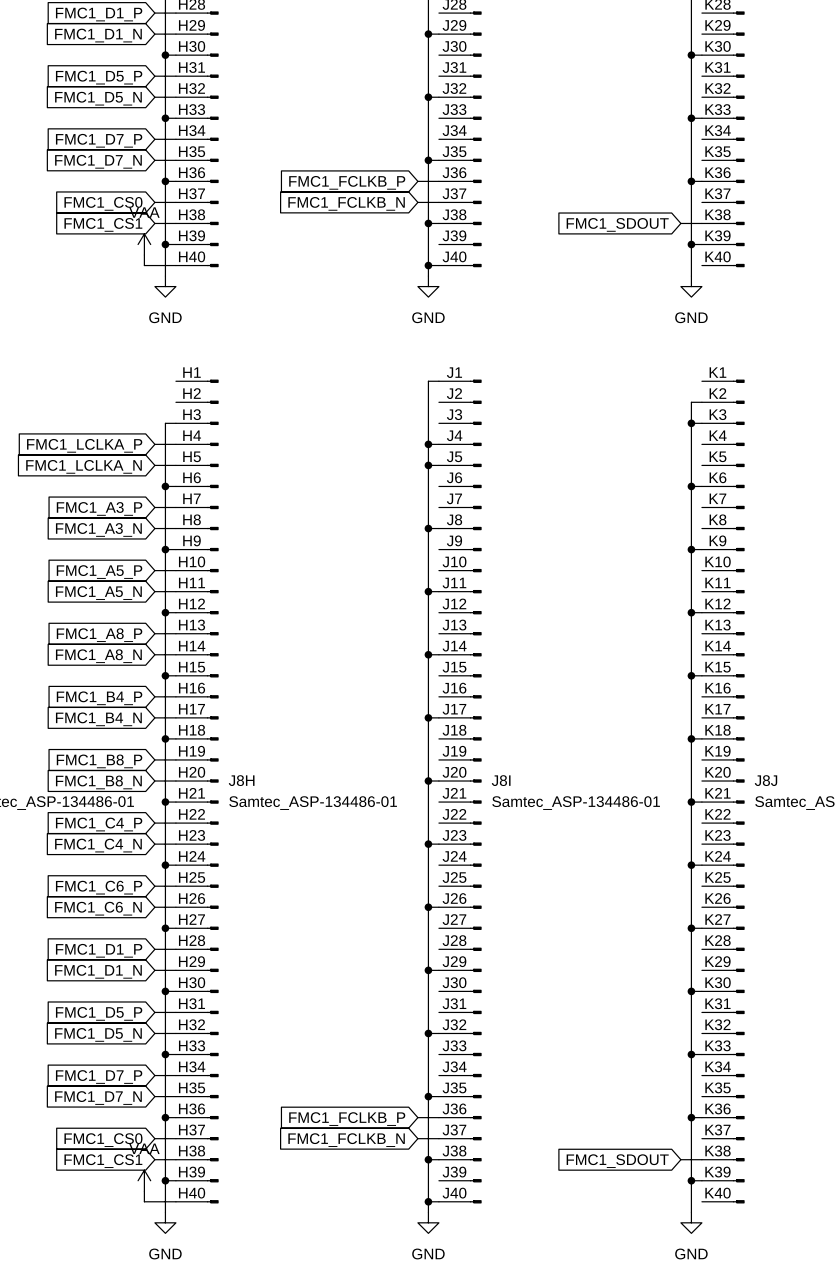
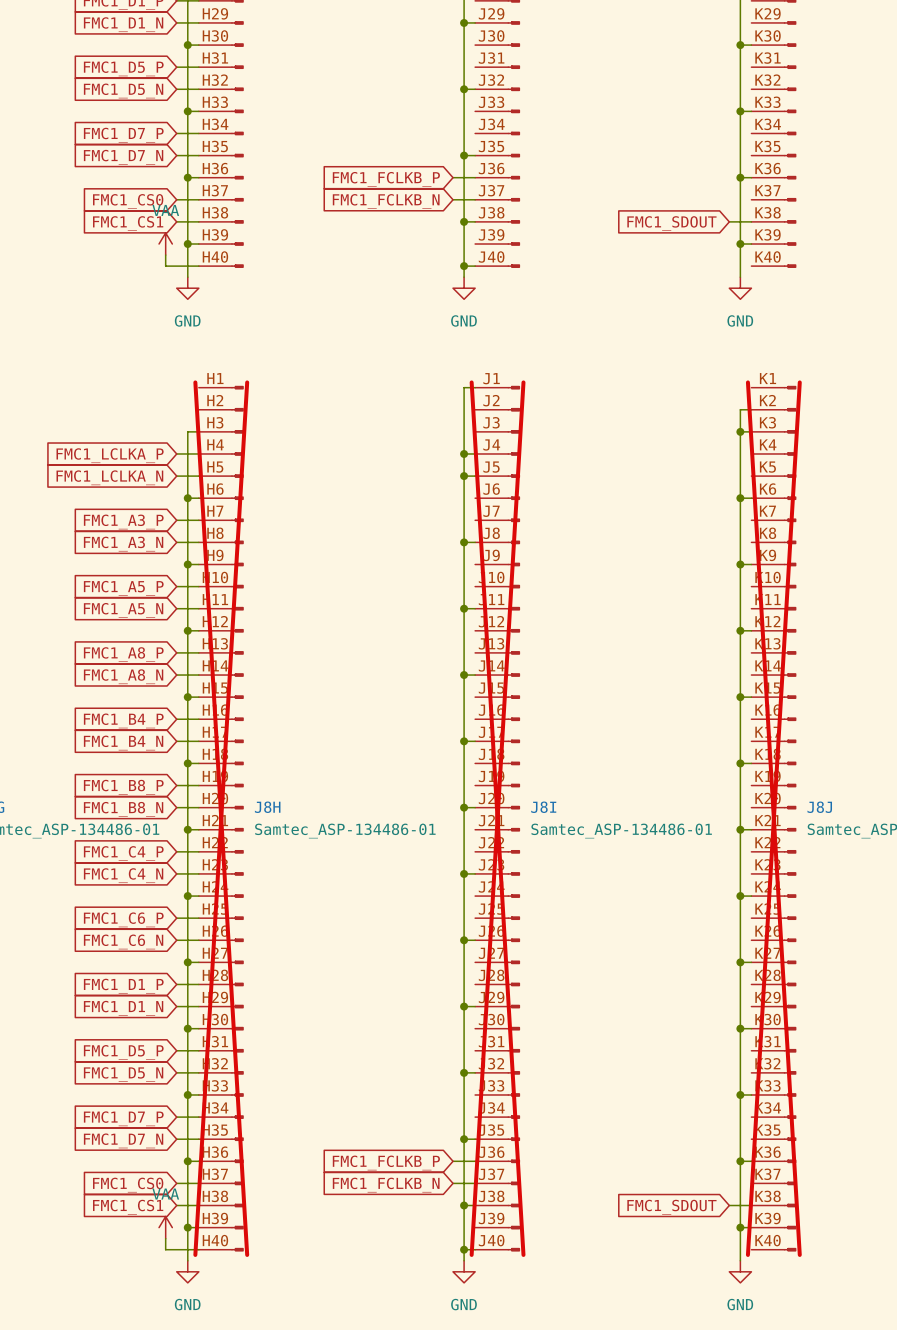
J8H do-not-place cross: none -> (221, 818)
J8I do-not-place cross: none -> (497, 818)
J8J do-not-place cross: none -> (773, 818)

